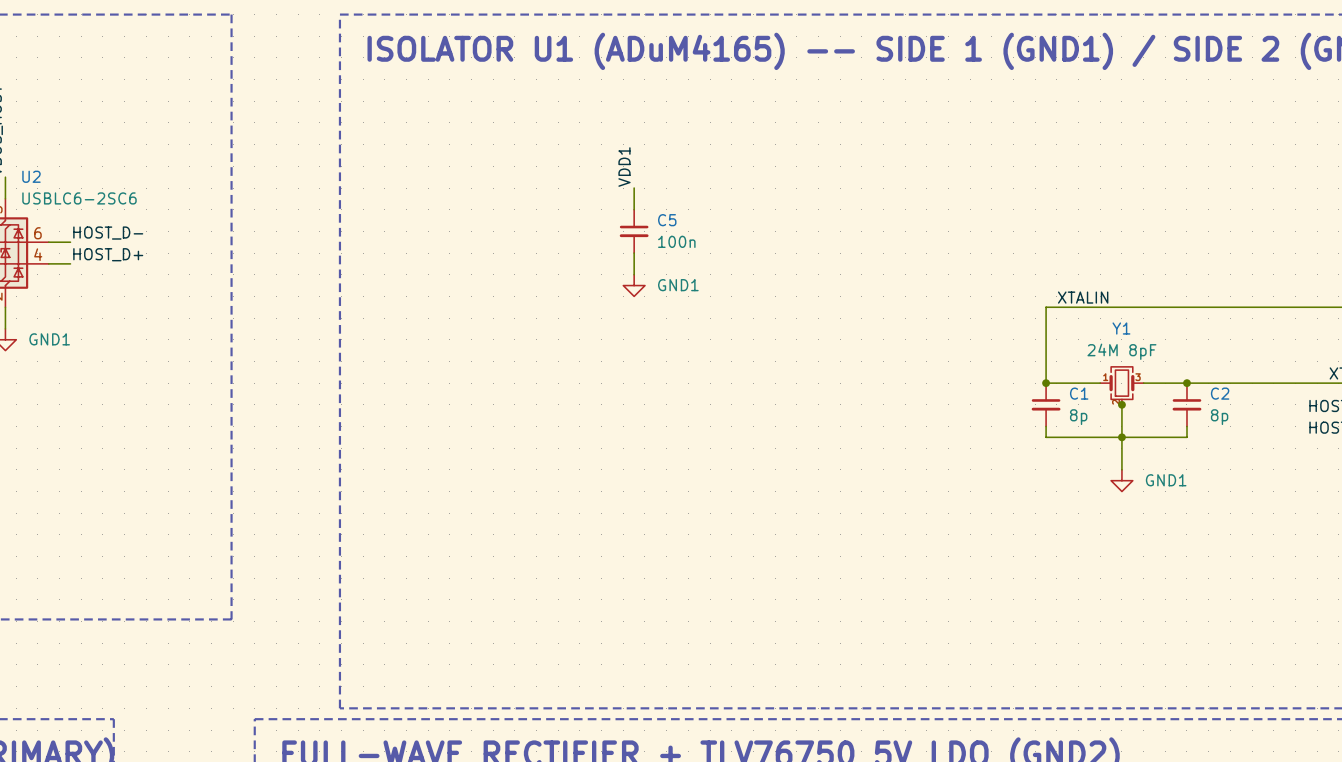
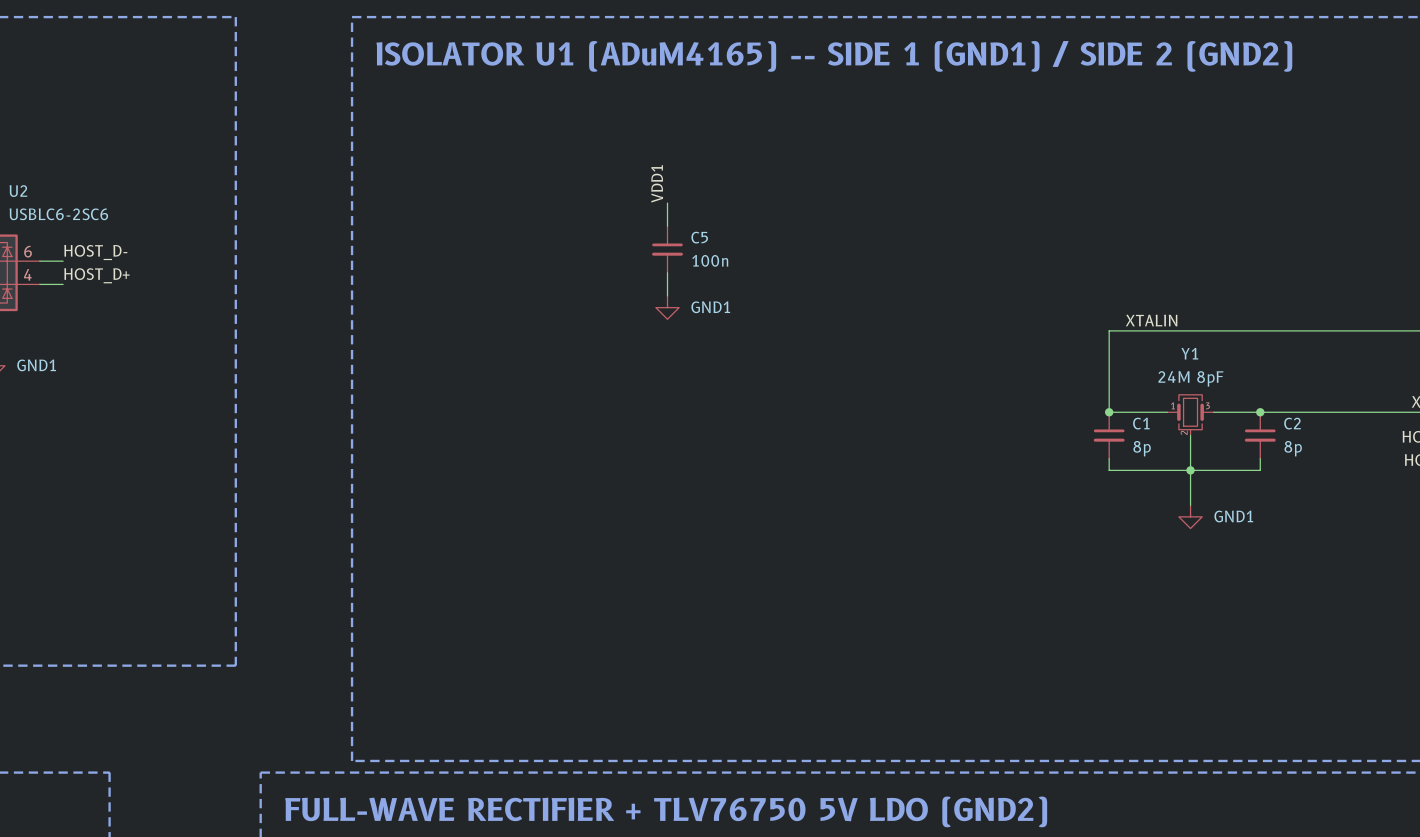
junction: (1121, 404) -> none

